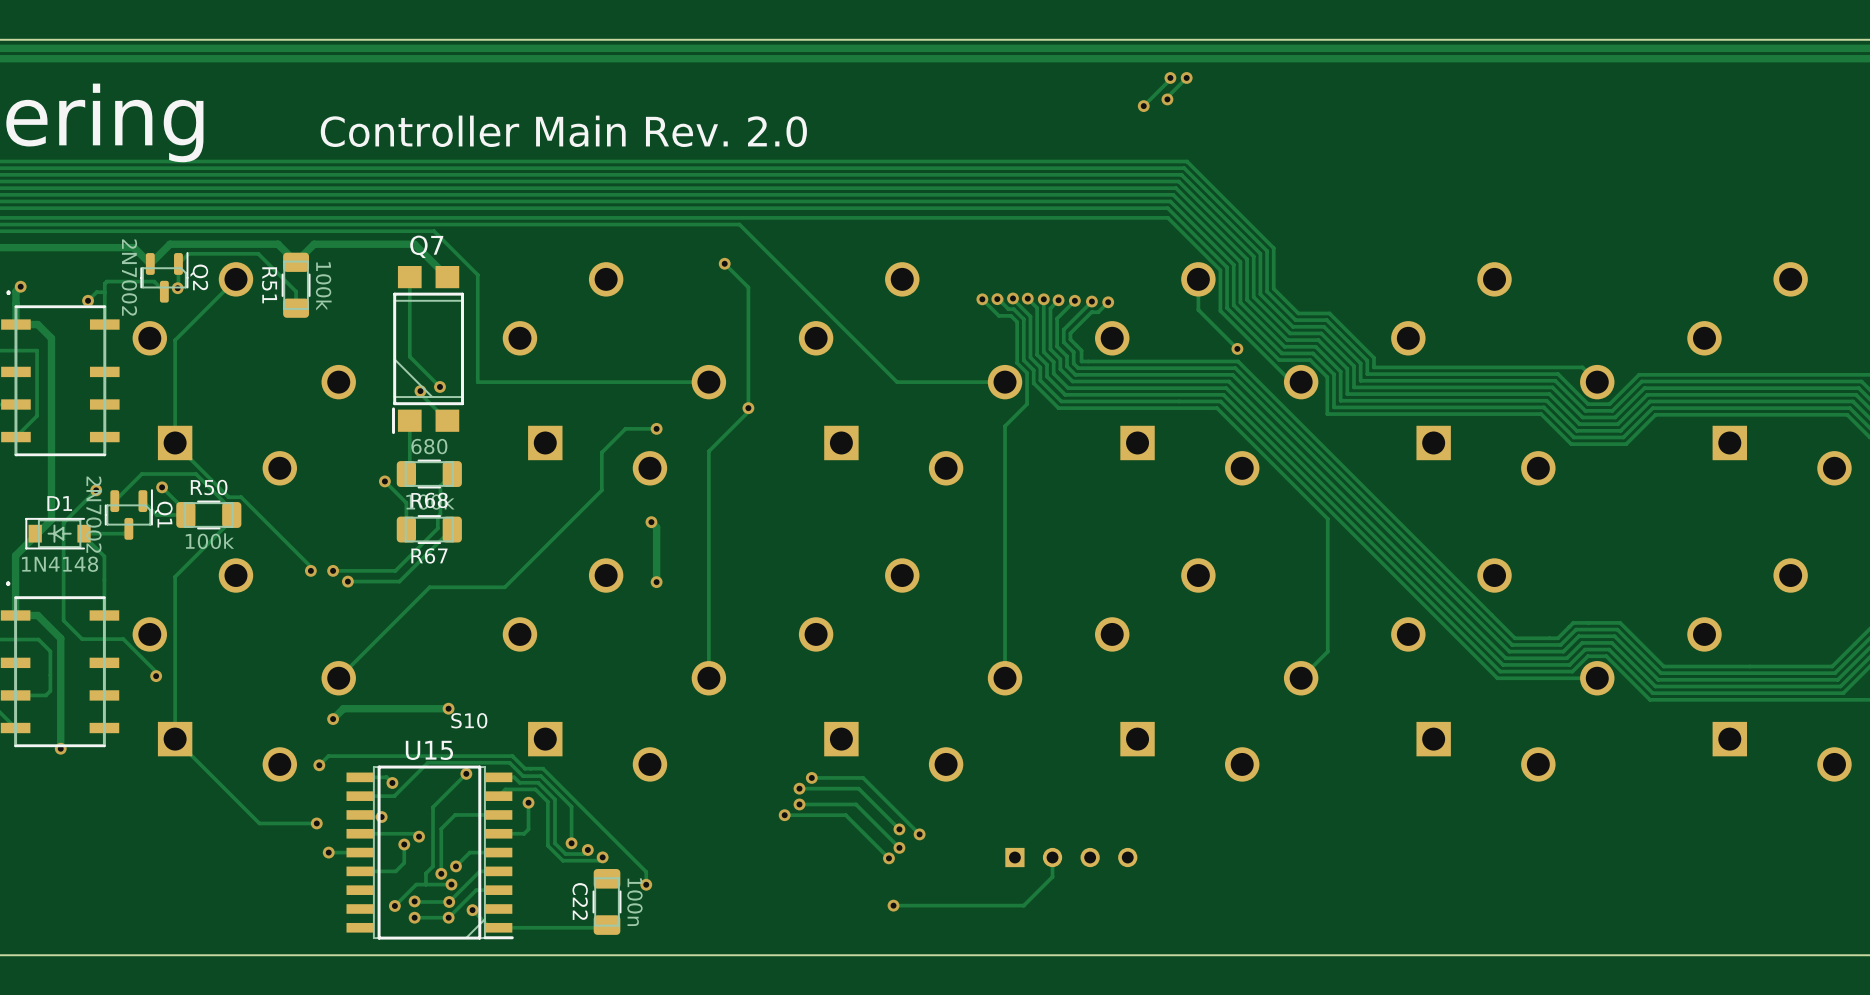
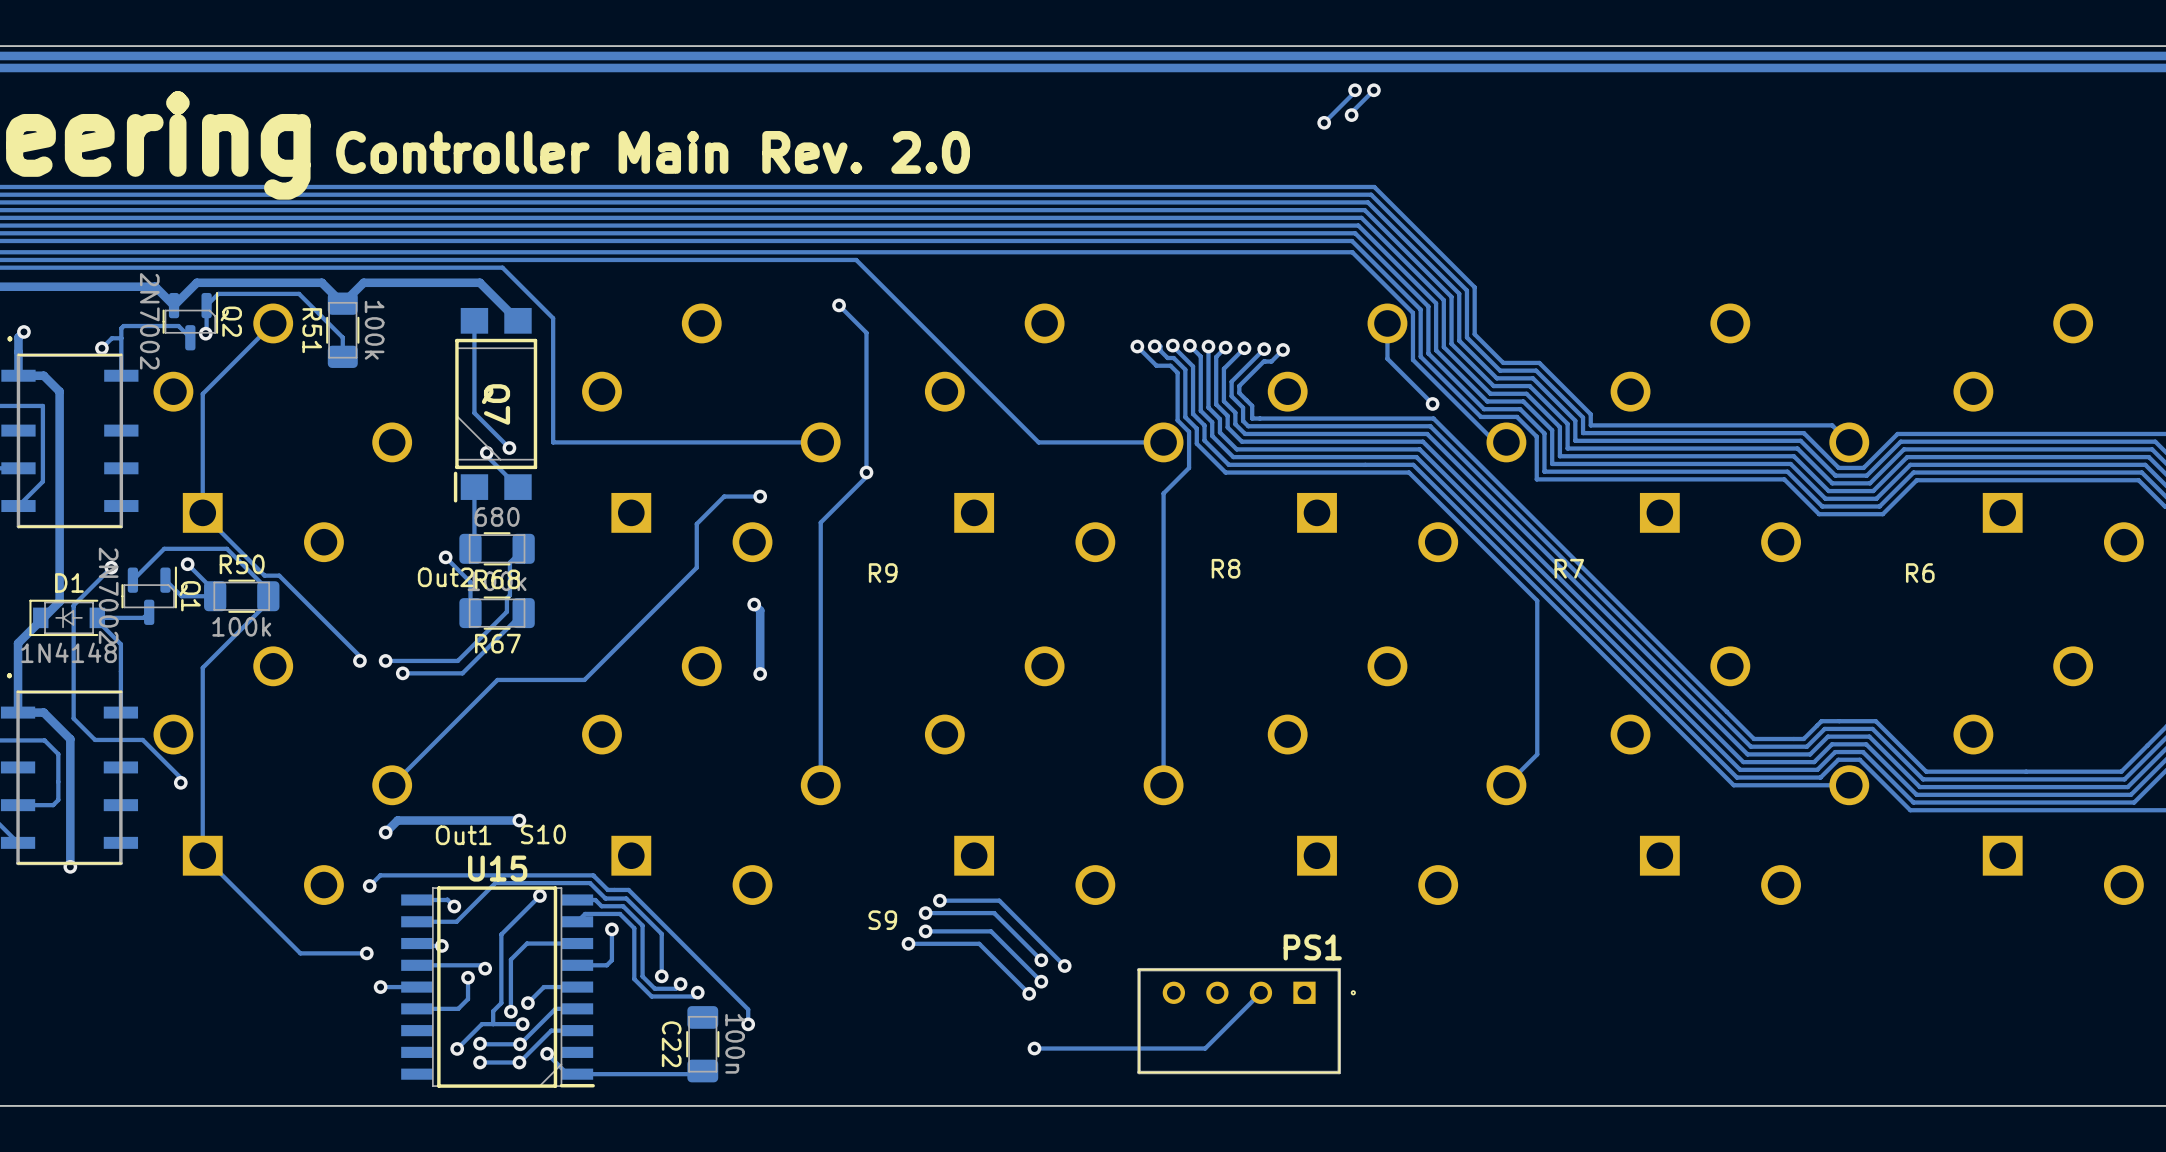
Q7 name rotation: 0° (426, 246) -> 90° clockwise (495, 404)
Q7 name position: Q7 (426, 246) -> Q7 (495, 404)
text: none -> R8 (1226, 568)
text: none -> R7 (1569, 568)
text: none -> R9 (883, 573)
text: none -> R6 (1920, 573)
text: none -> Out2 (445, 577)
text: none -> Out1 (463, 835)
text: none -> S9 (882, 920)
track: (1052, 857) (1052, 876) (1023, 905) -> (1260, 992) (1205, 1048) (1185, 1048)
PS1 side: top (1071, 857) -> bottom (1246, 1021)

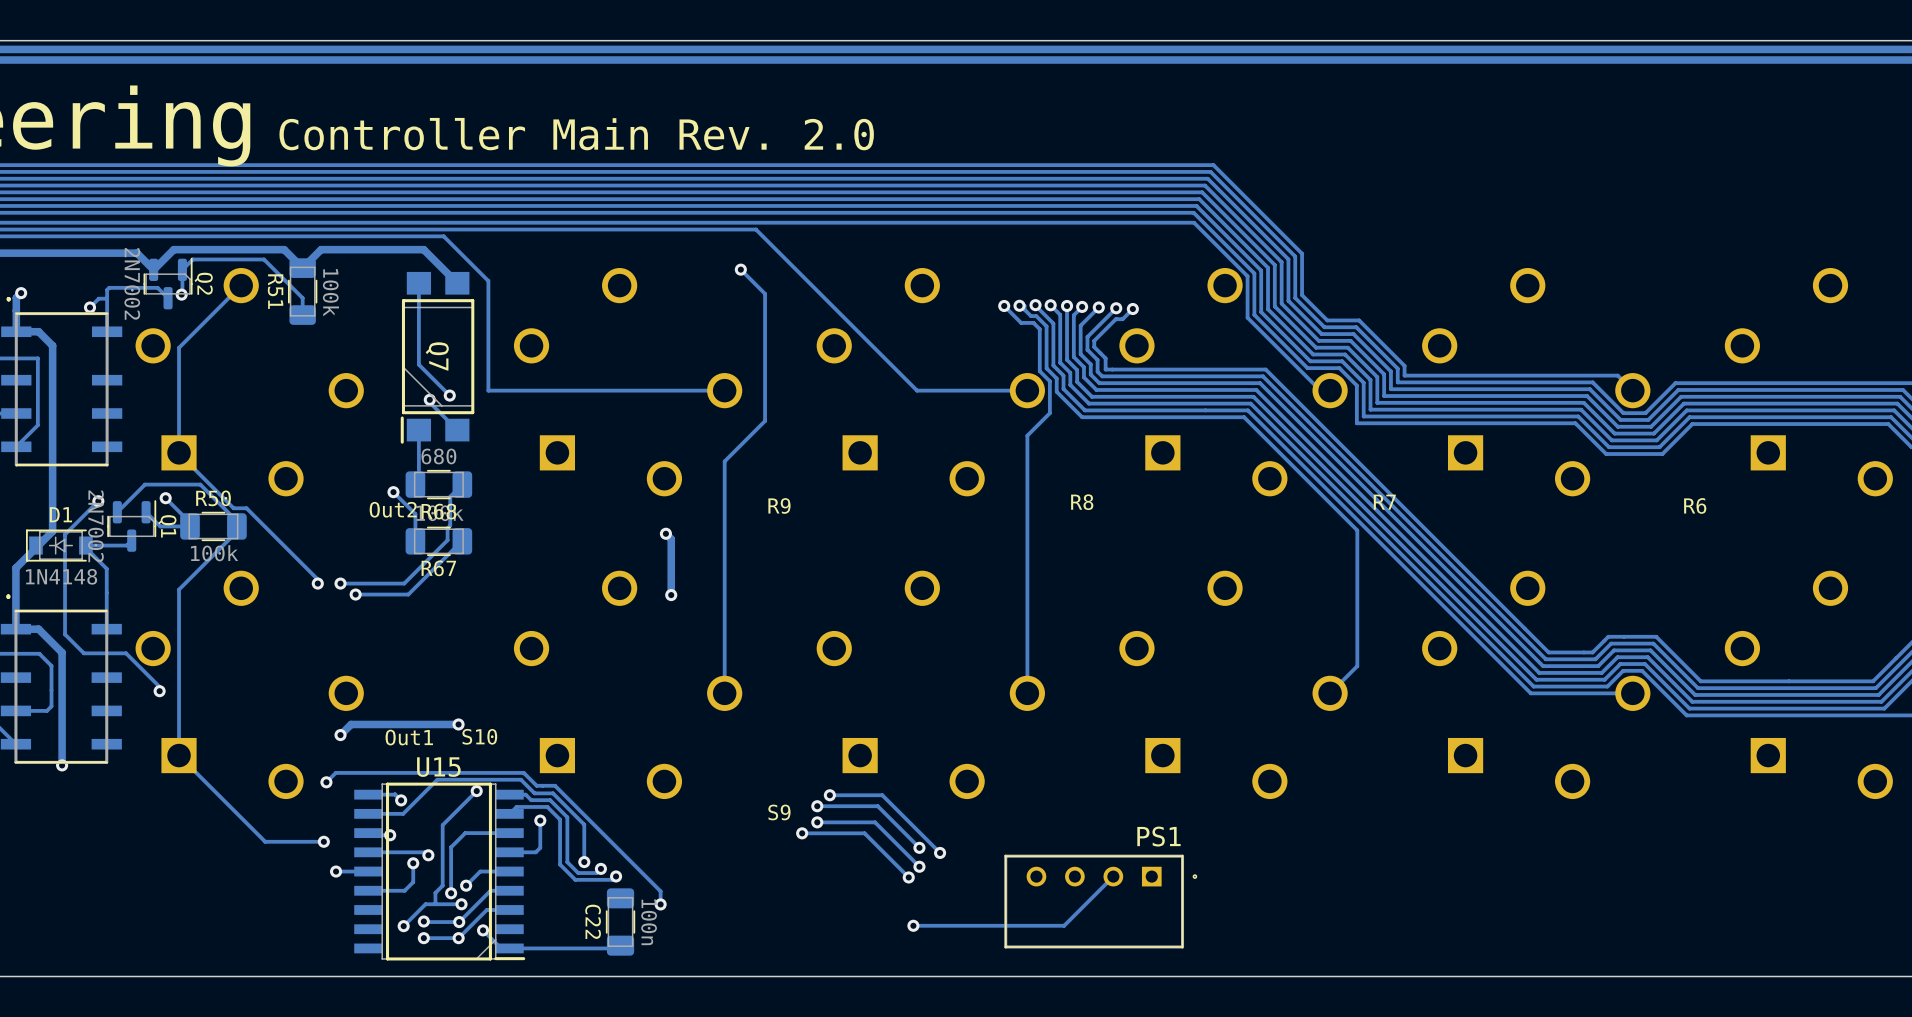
track: (1355, 90) (1324, 122) -> none
via: (1355, 90) -> none
track: (1373, 90) (1351, 112) (1351, 115) -> none
via: (1373, 90) -> none
via: (1351, 115) -> none
via: (1324, 122) -> none
track: (1387, 323) (1387, 358) (1432, 403) -> none
via: (1432, 403) -> none
via: (866, 472) -> none
track: (760, 496) (724, 496) (696, 523) (696, 567) (584, 679) (497, 679) (392, 785) -> none
via: (760, 496) -> none

